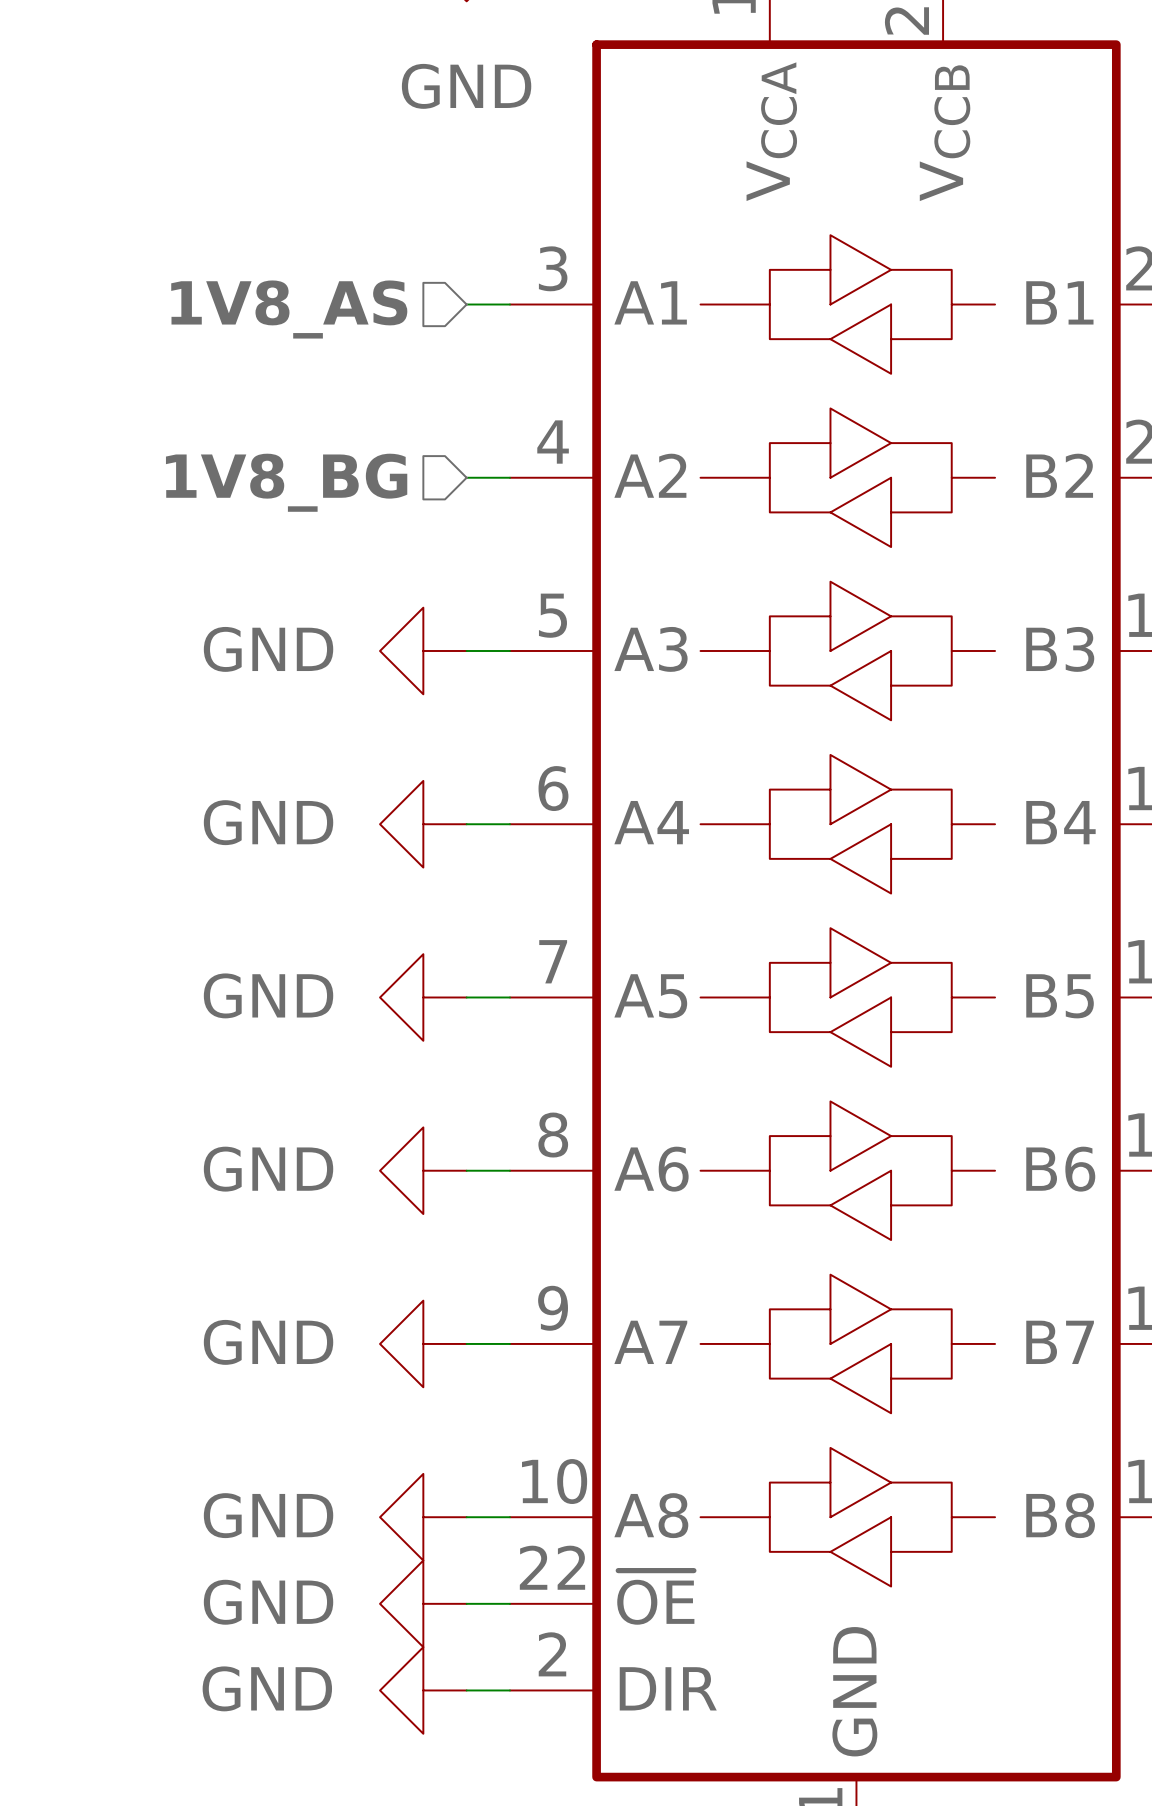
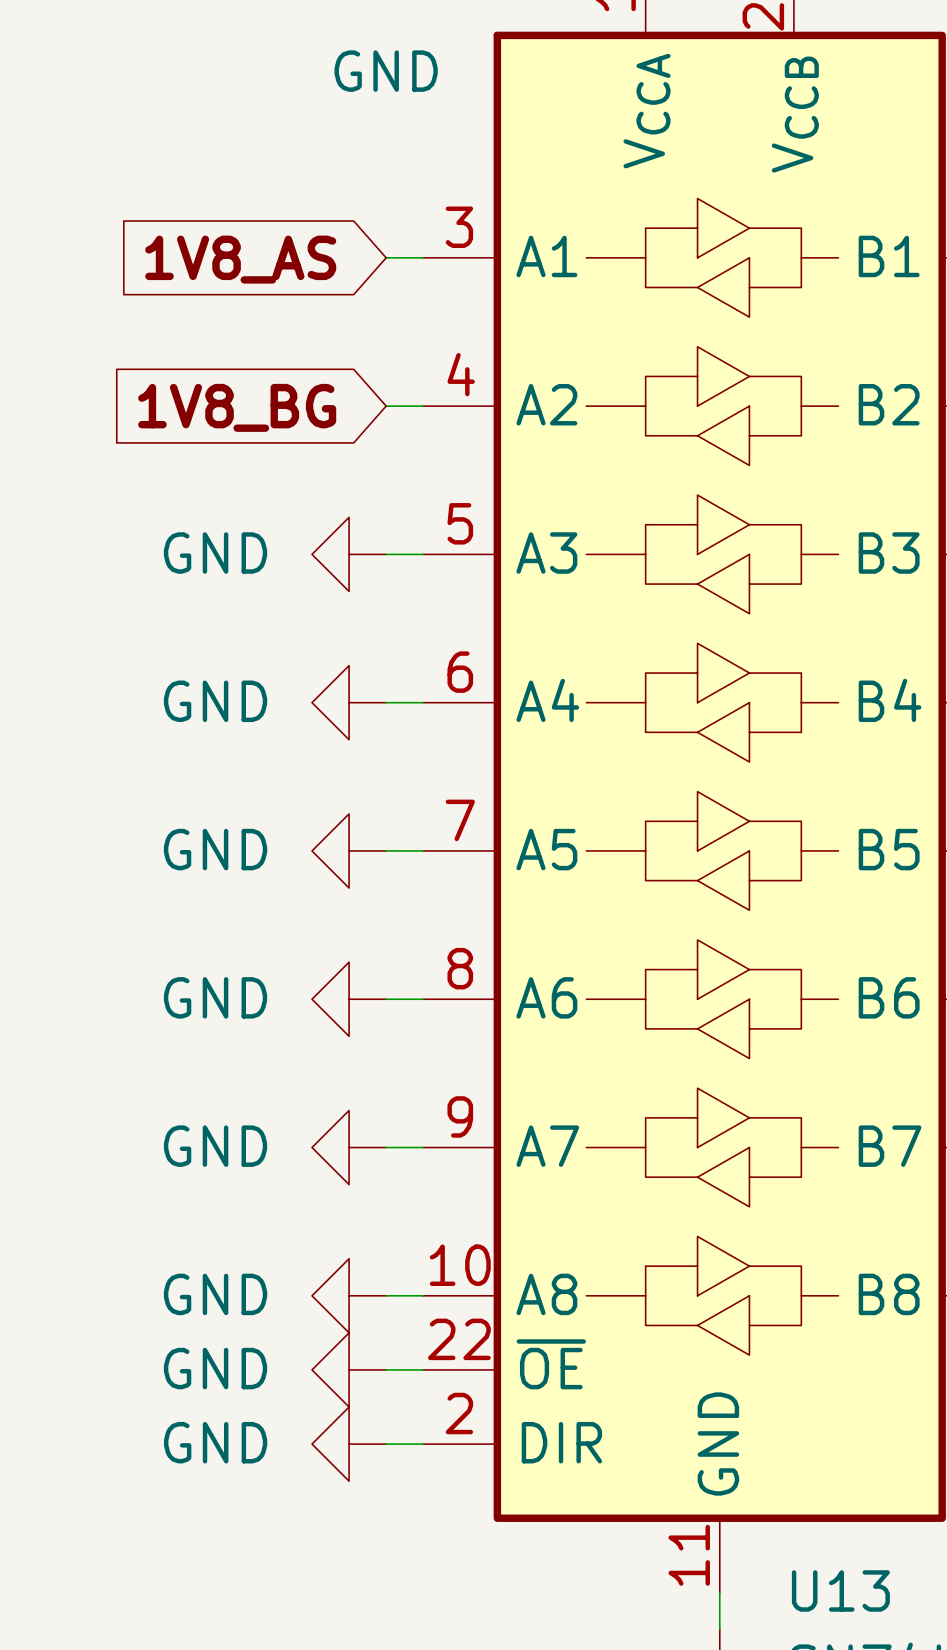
hierarchical label: 1V8_AS (289, 309) -> none
global label: none -> 1V8_AS (240, 259)
hierarchical label: 1V8_BG (286, 482) -> none
global label: none -> 1V8_BG (237, 407)

